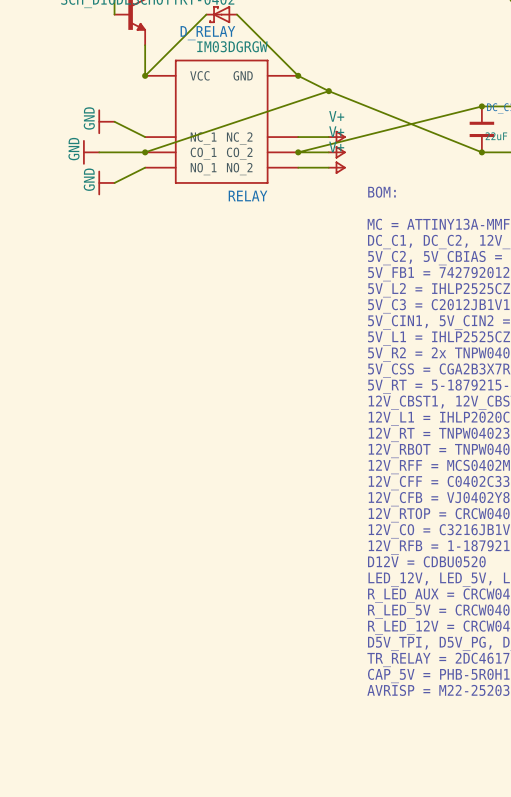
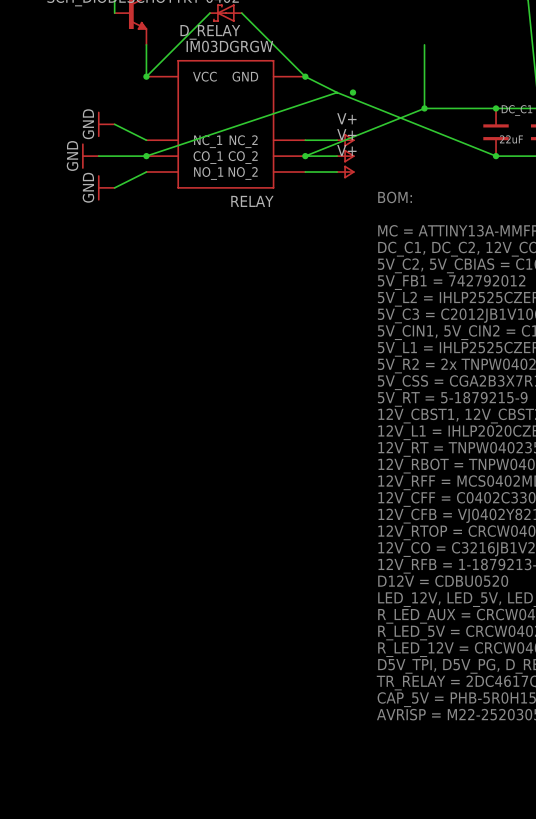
wire: none -> (424, 44) (424, 108)
junction position: (328, 91) -> (353, 92)
wire: none -> (424, 108) (496, 108)
junction: none -> (424, 108)
wire: (481, 106) (298, 152) -> (424, 108) (305, 156)

